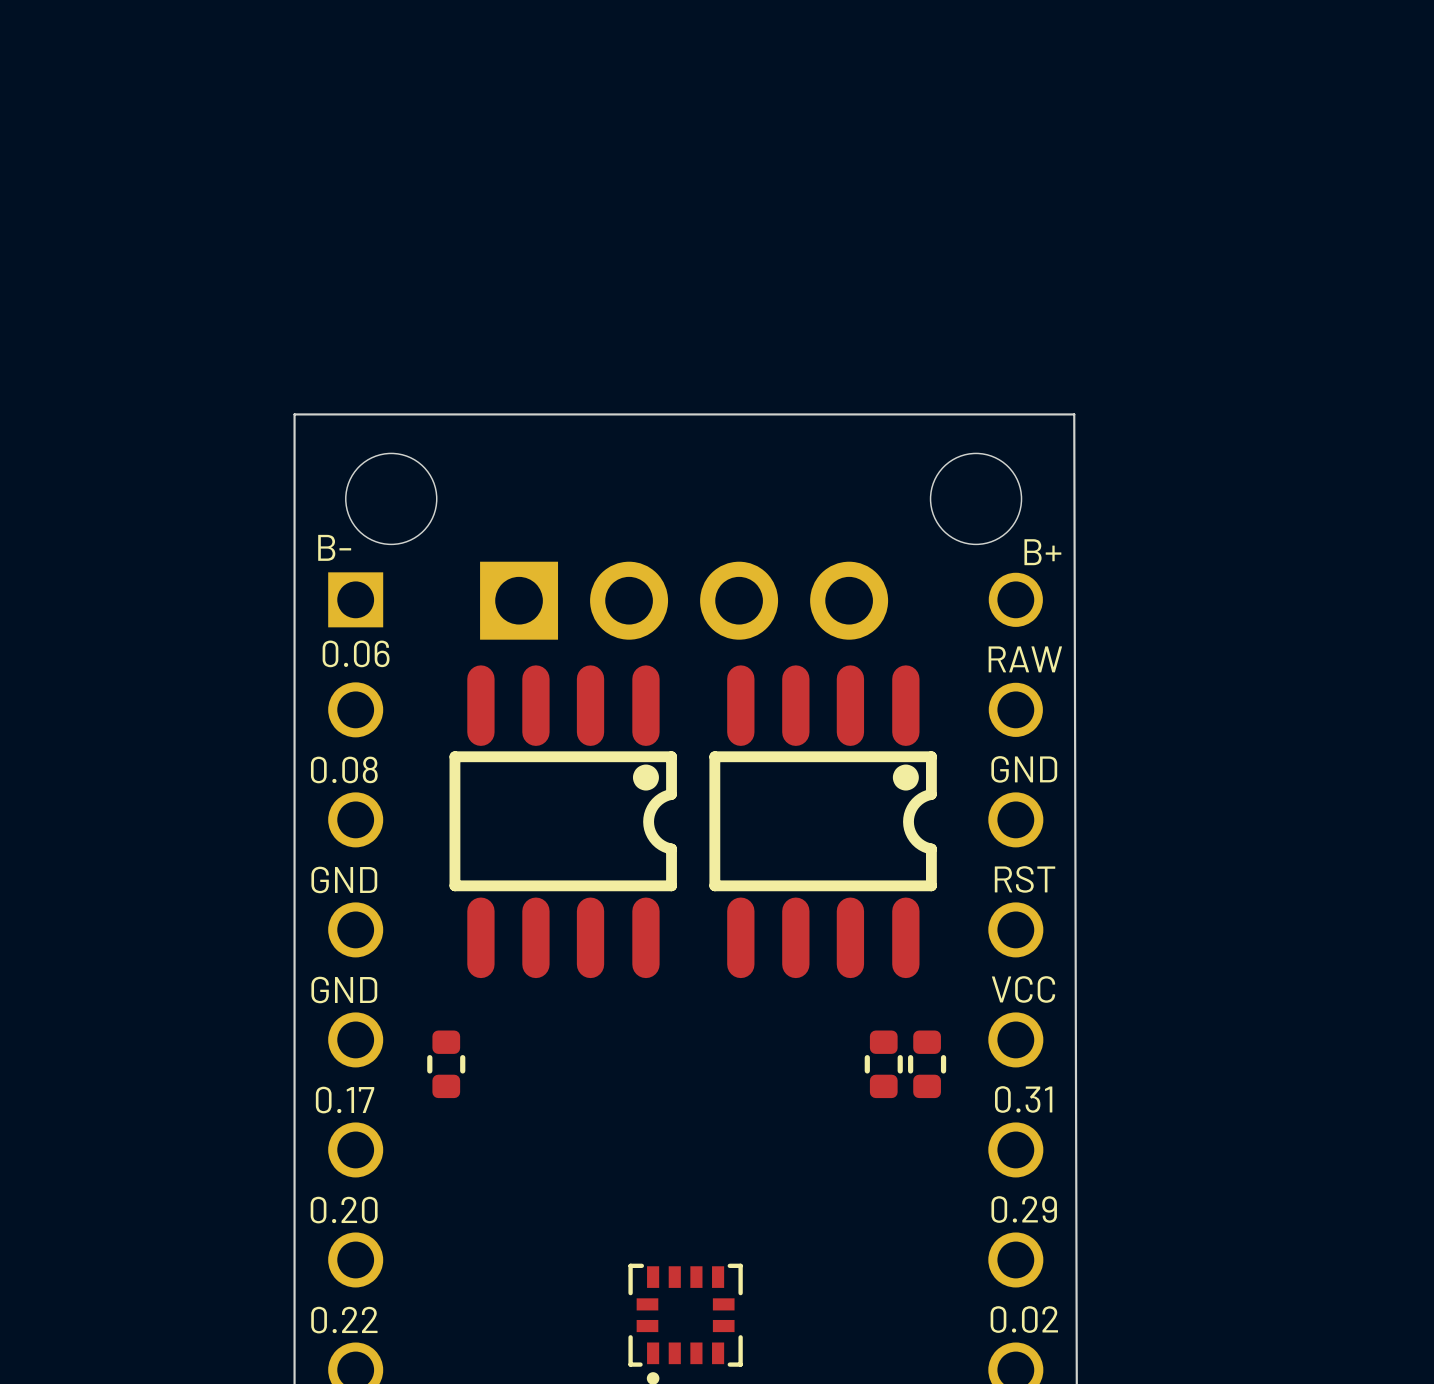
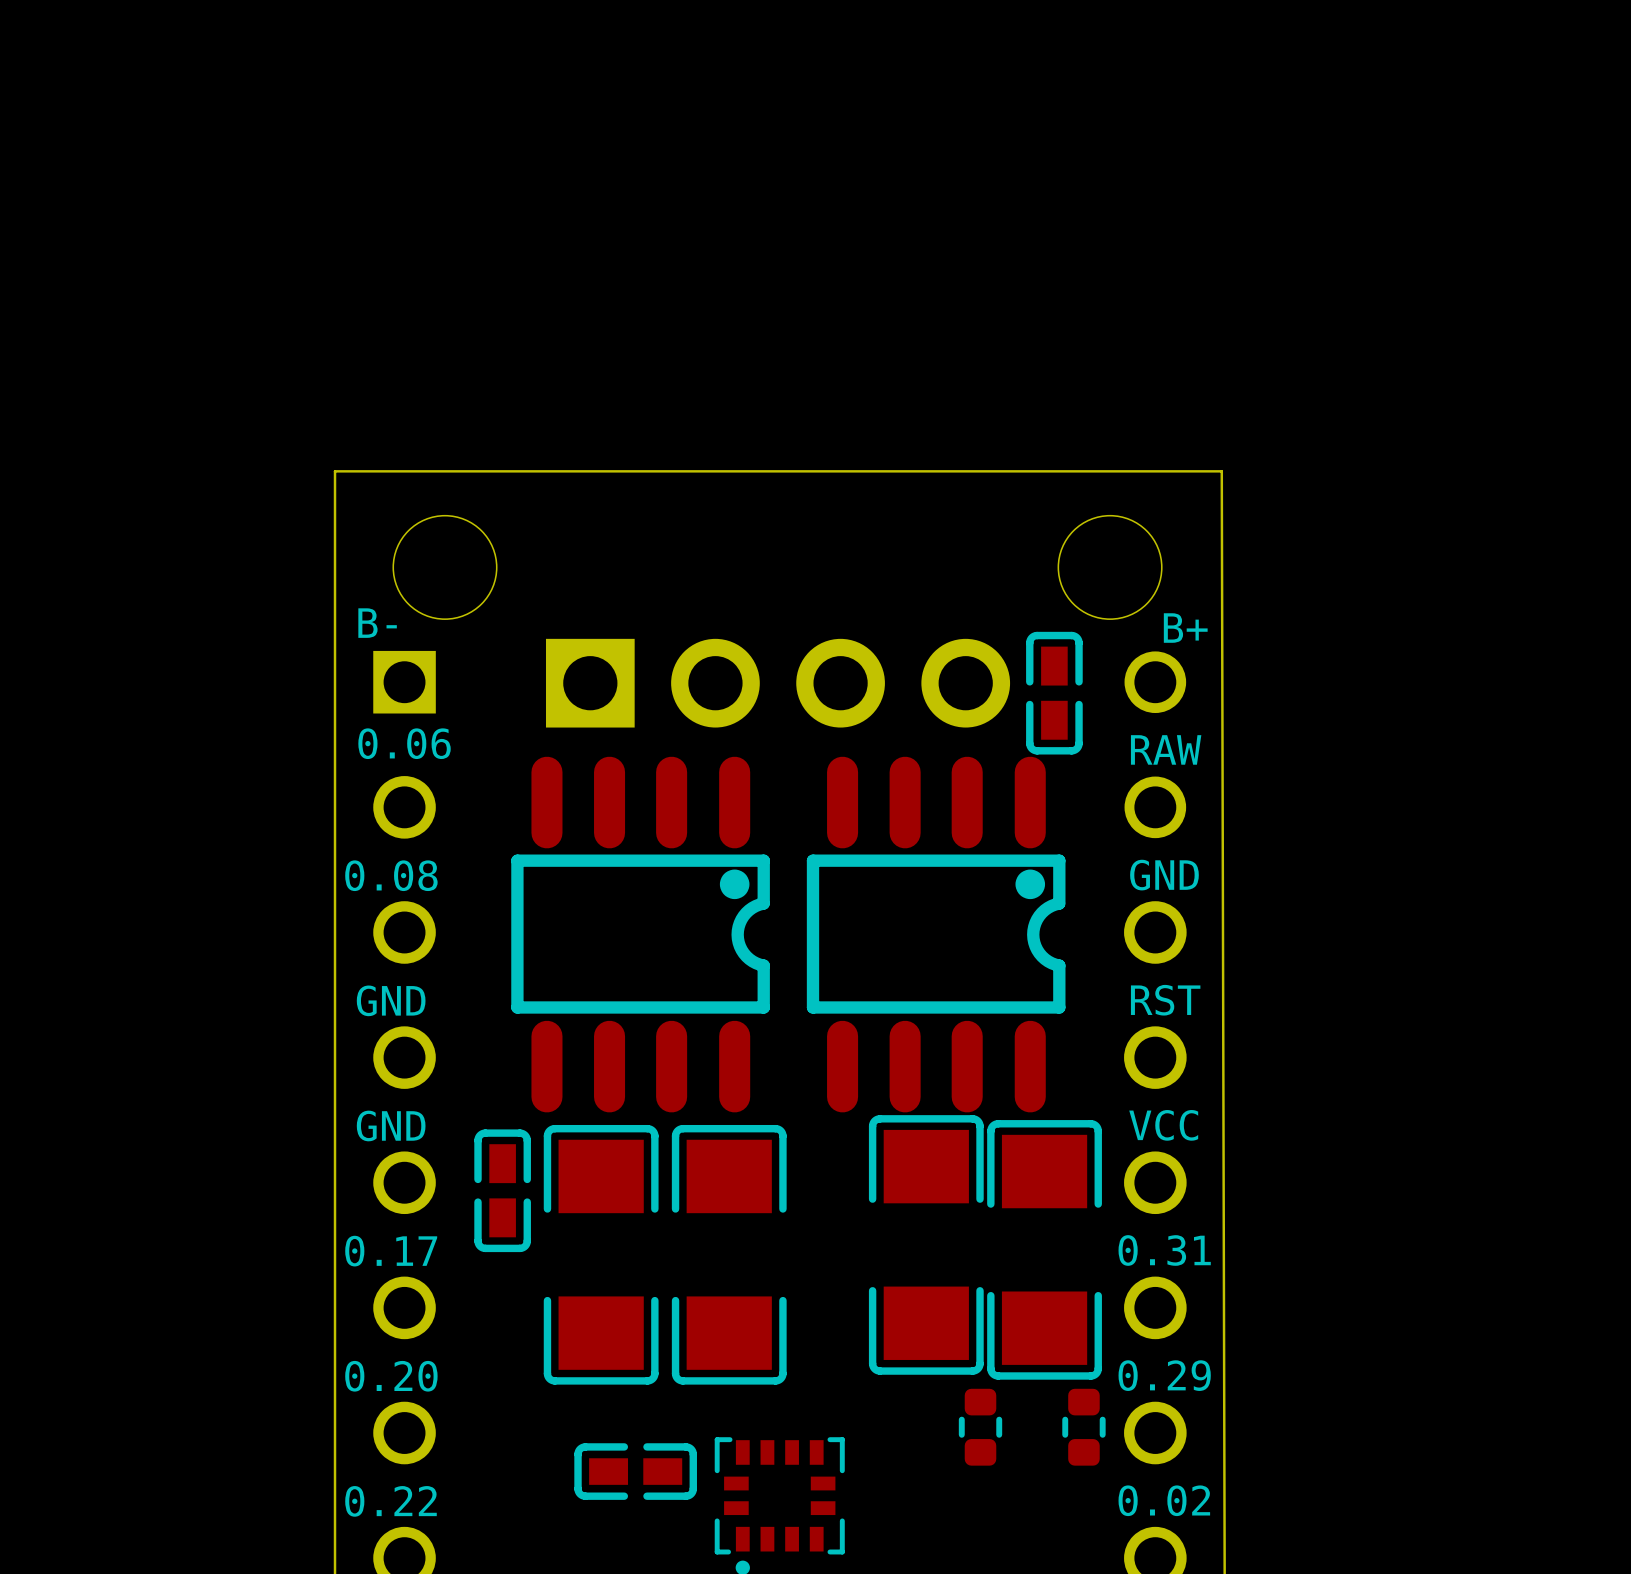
part: none -> (1054, 693)
part footprint: [427, 1030, 466, 1099] -> [474, 1129, 531, 1253]
part: (883, 1064) -> none
part: (927, 1064) -> none
part: none -> (926, 1244)
part: none -> (1044, 1249)
part: none -> (601, 1254)
part: none -> (729, 1254)
part: none -> (980, 1427)
part: none -> (1083, 1427)
part: none -> (635, 1471)

